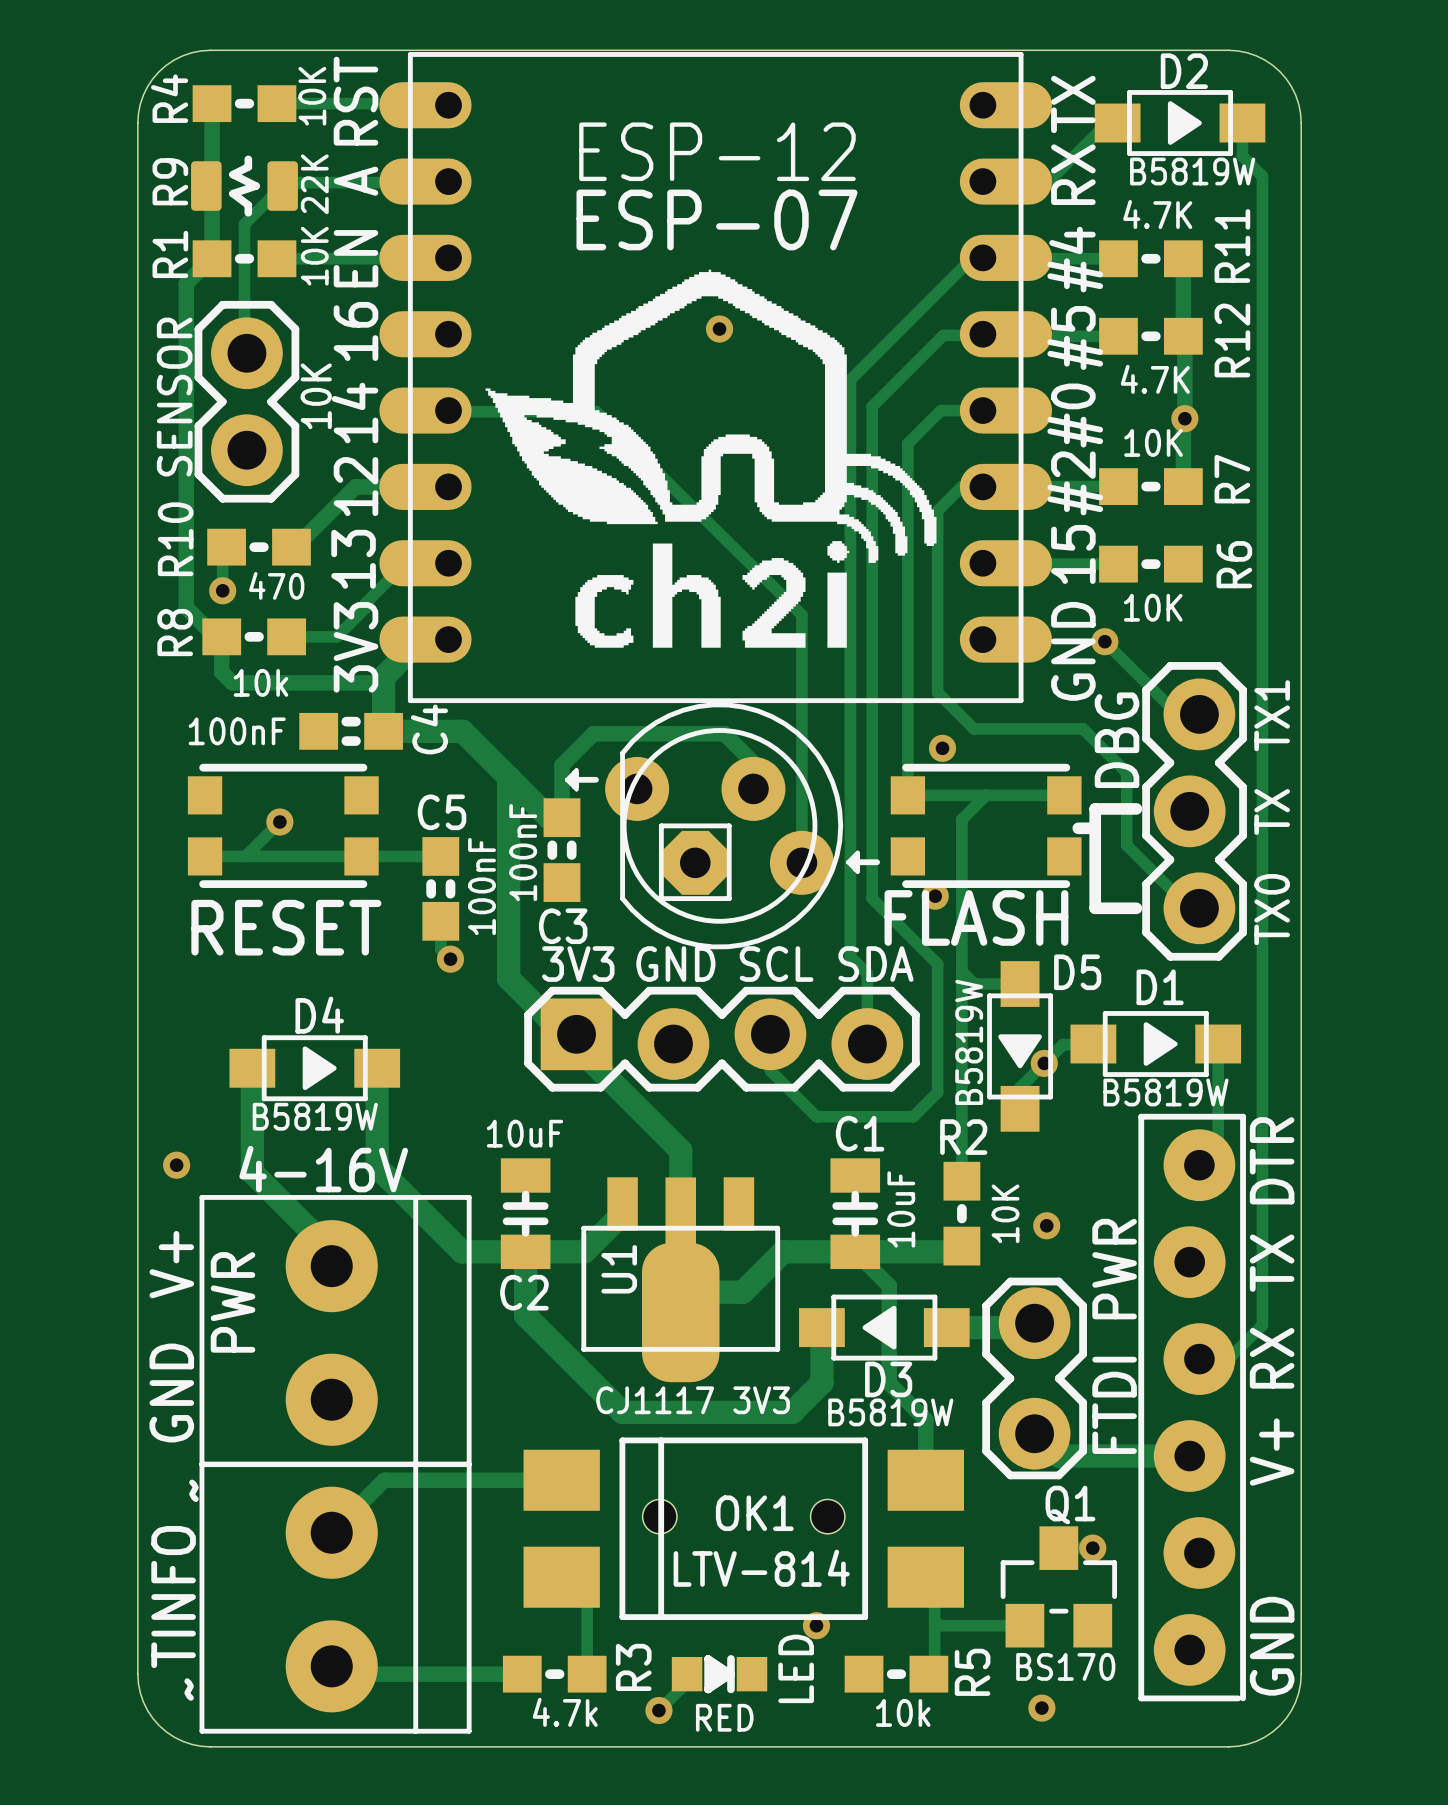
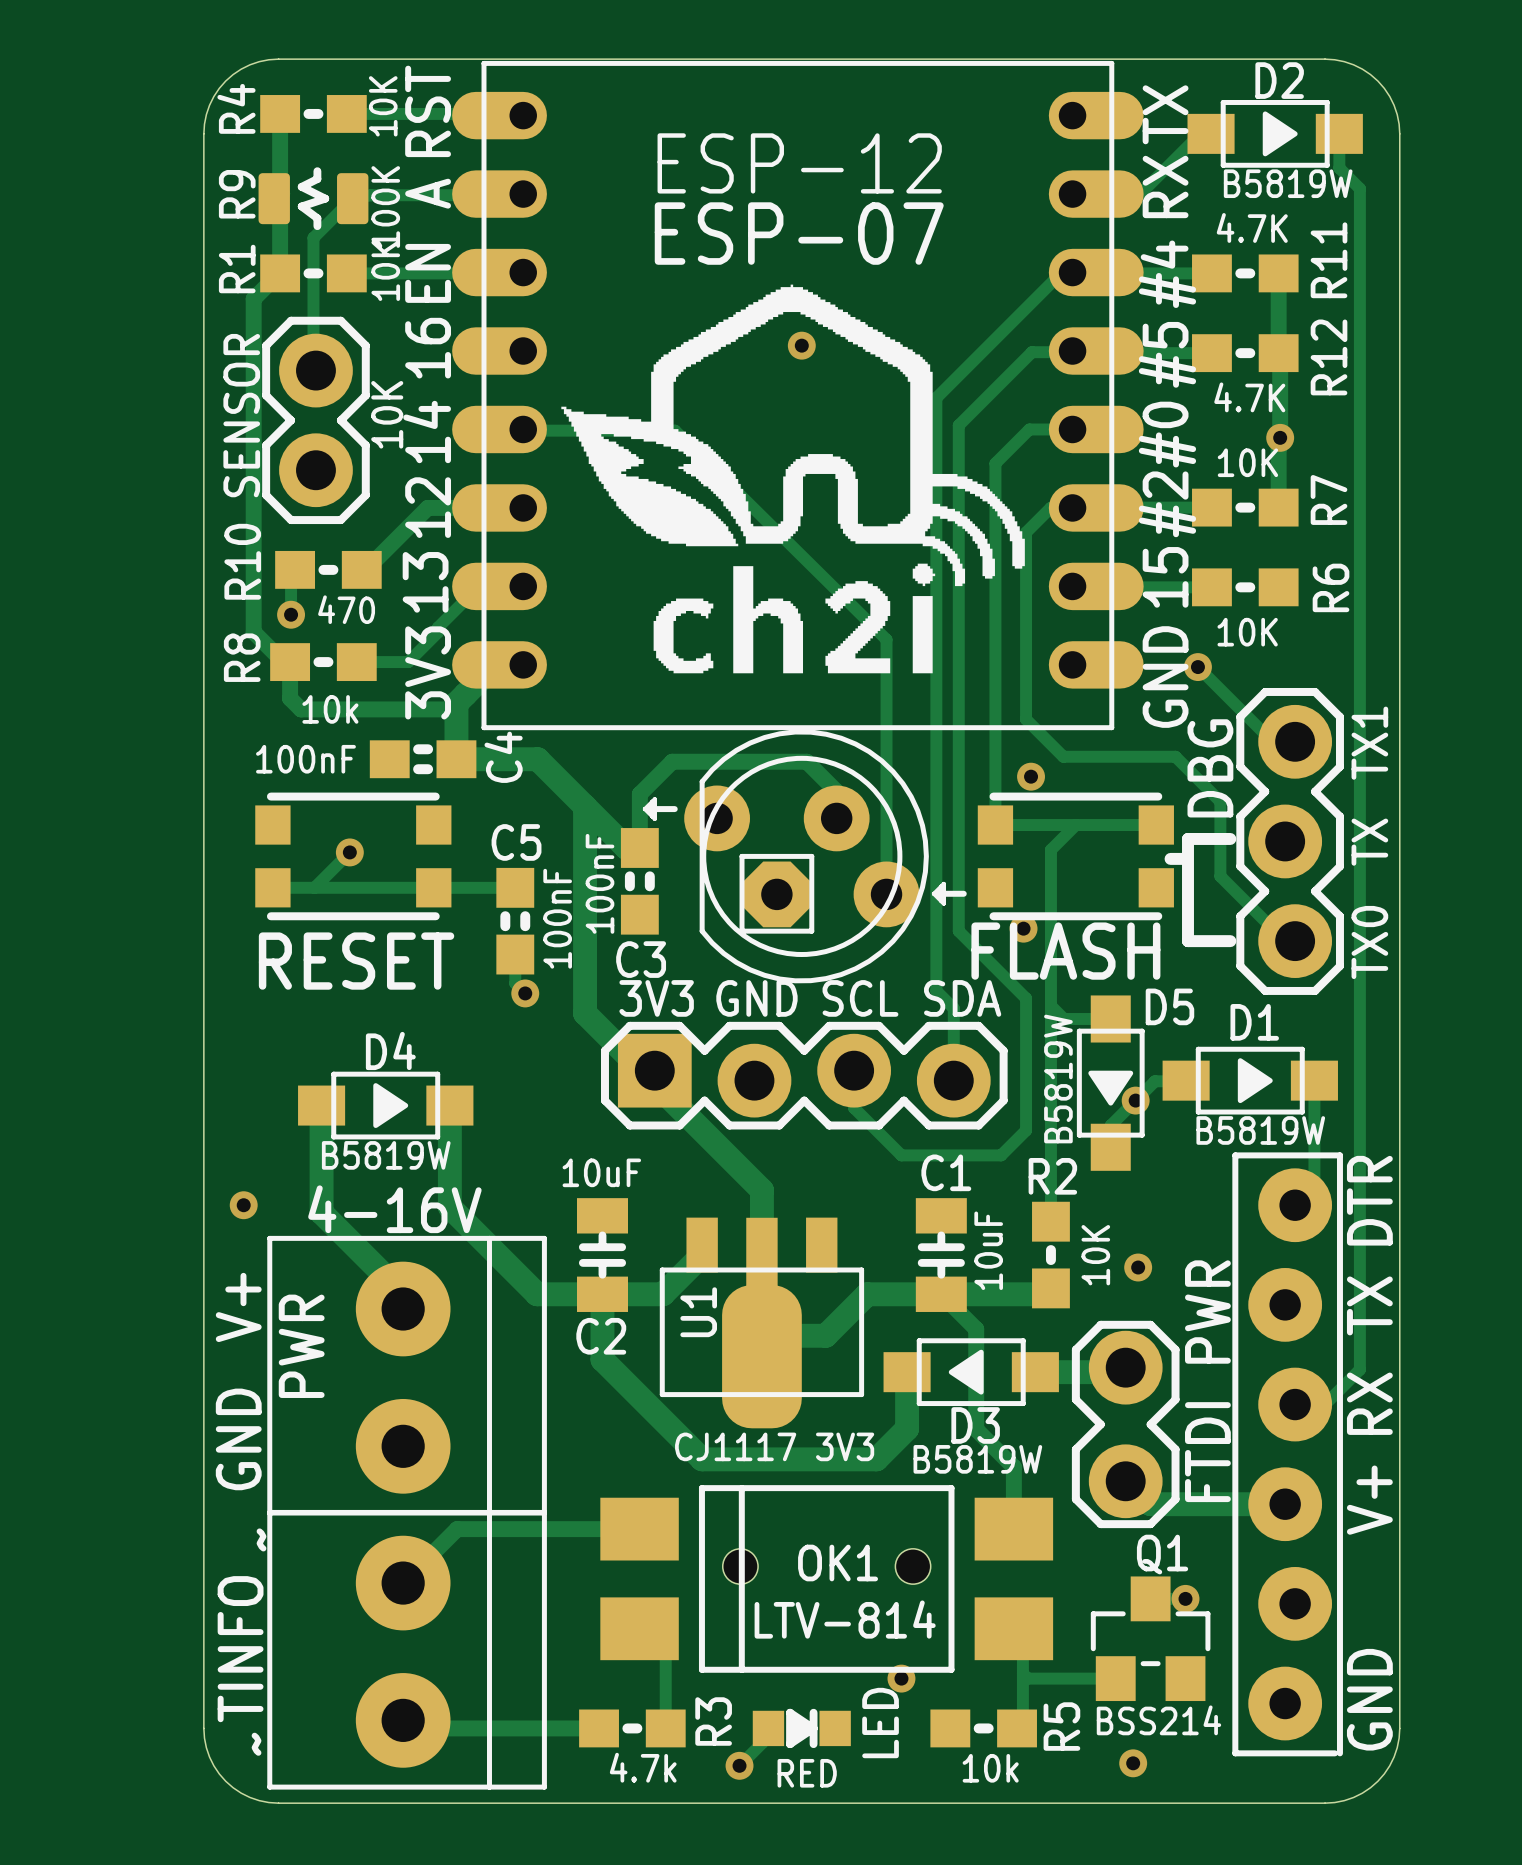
R9 value: 22K (314, 184) -> 100K (385, 206)
Q1 value: BS170 (1065, 1666) -> BSS214 (1158, 1720)

